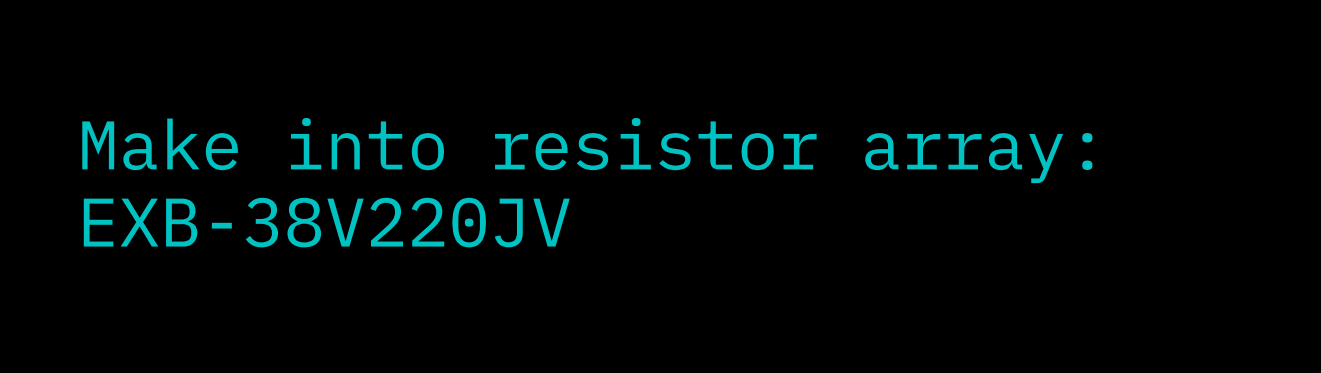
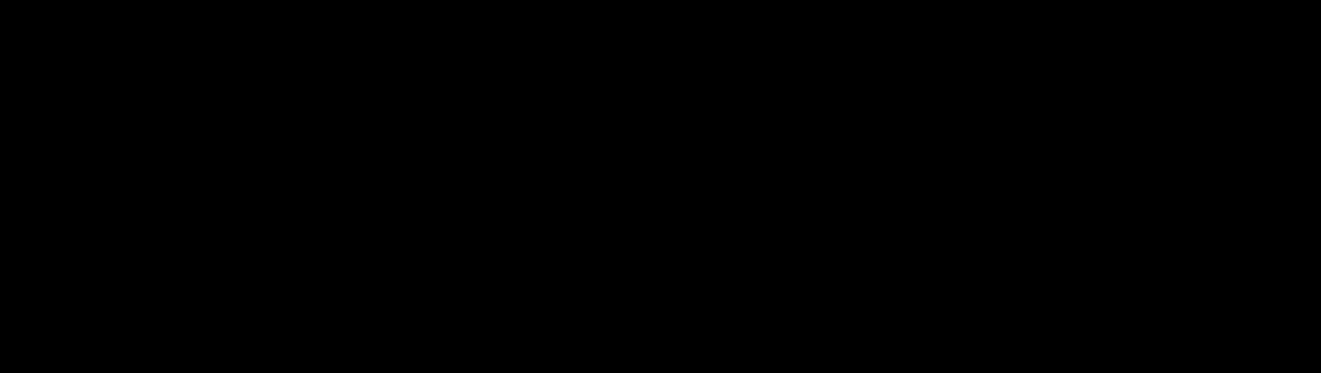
text: Make into resistor array: (587, 150) -> none
text: EXB-38V220JV (326, 222) -> none

